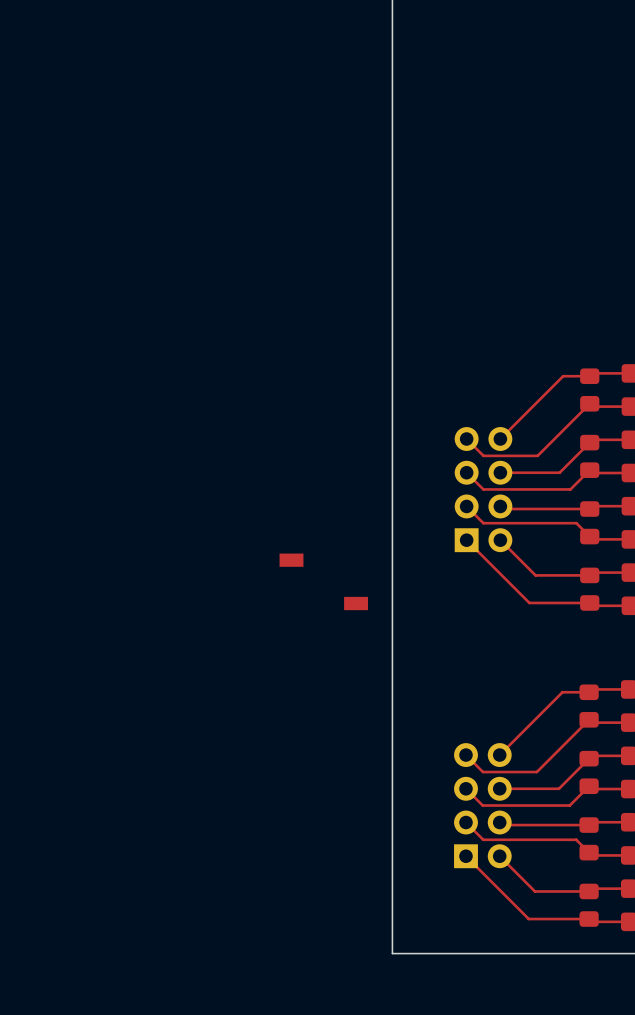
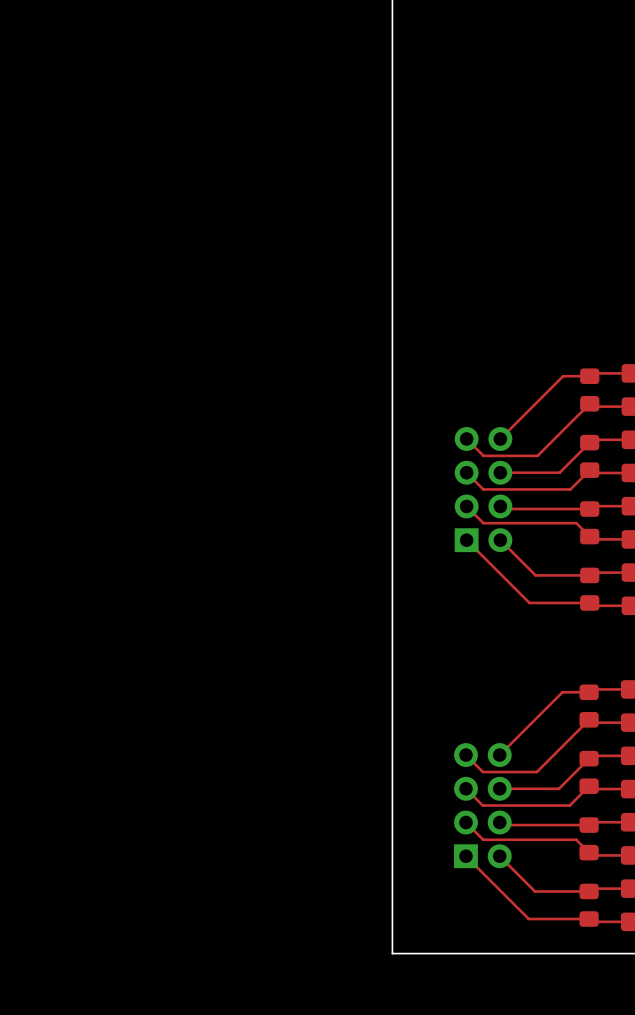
part: (291, 560) -> none
part: (356, 603) -> none

